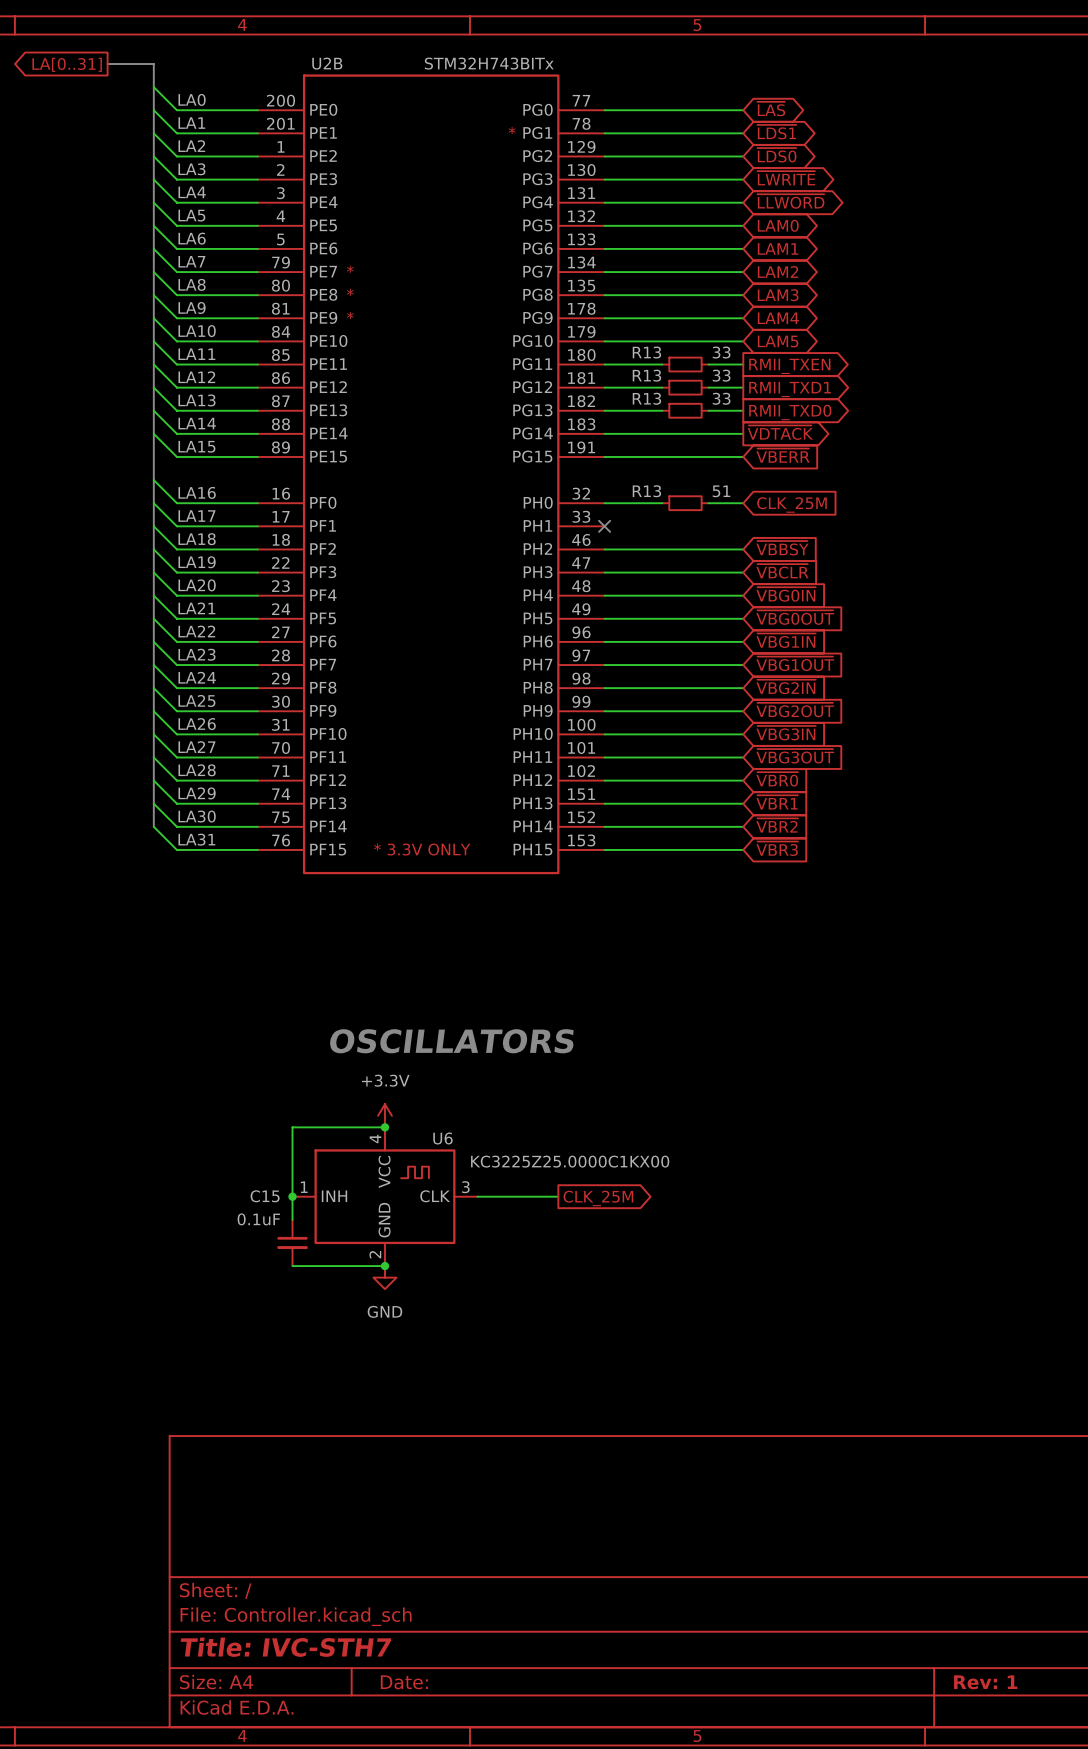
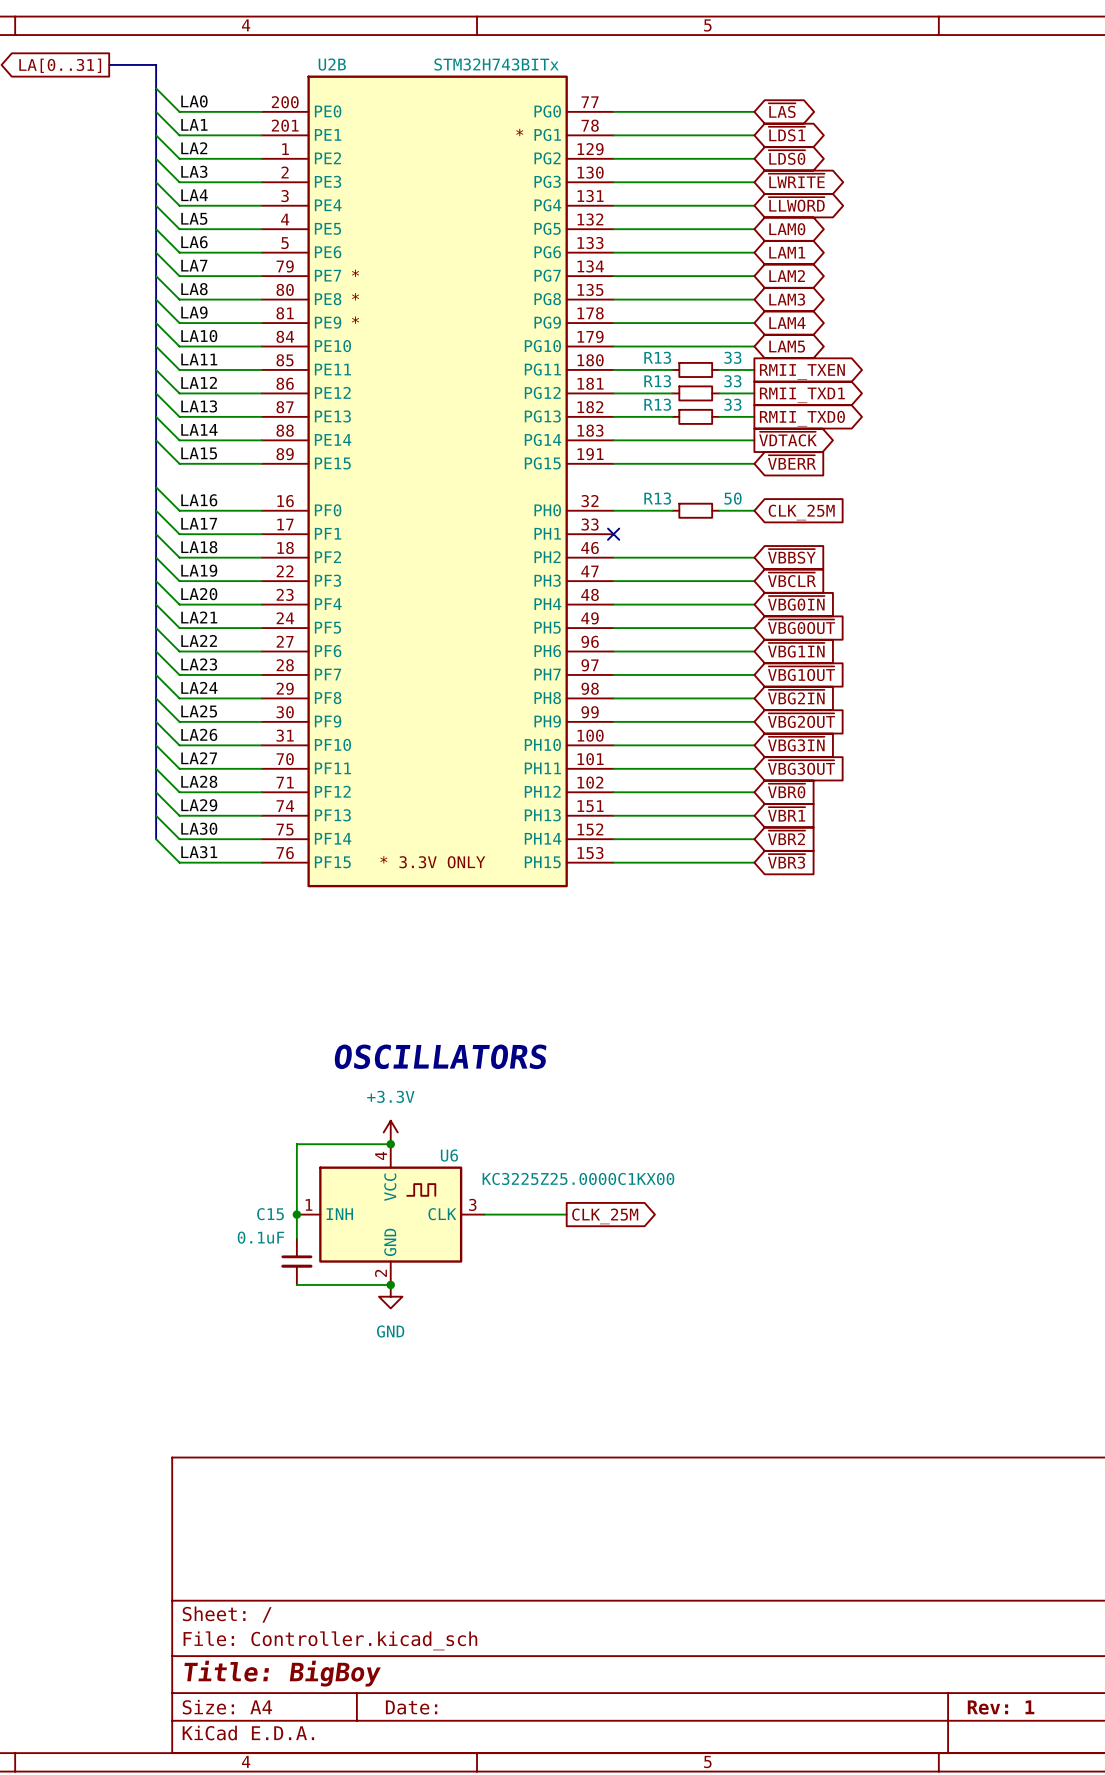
R13 value: 51 (721, 491) -> 50 (733, 498)
title block: Title: IVC-STH7 (286, 1647) -> Title: BigBoy (282, 1673)

